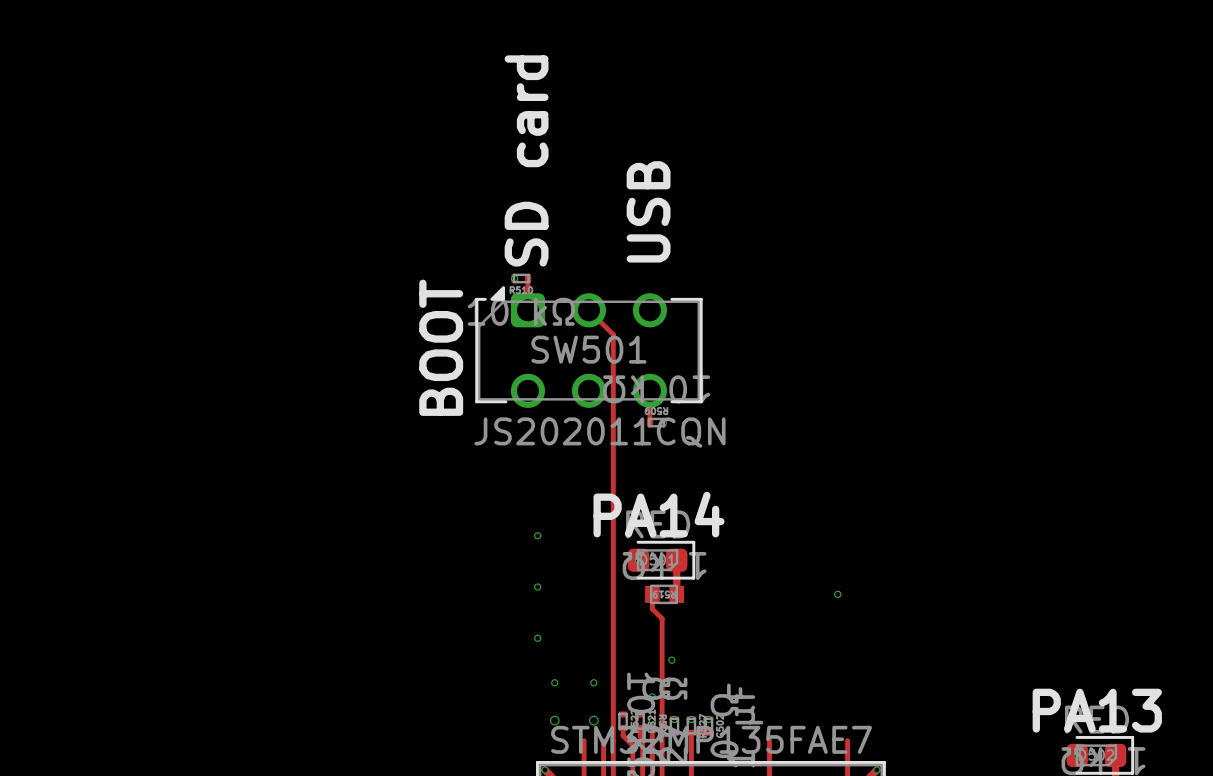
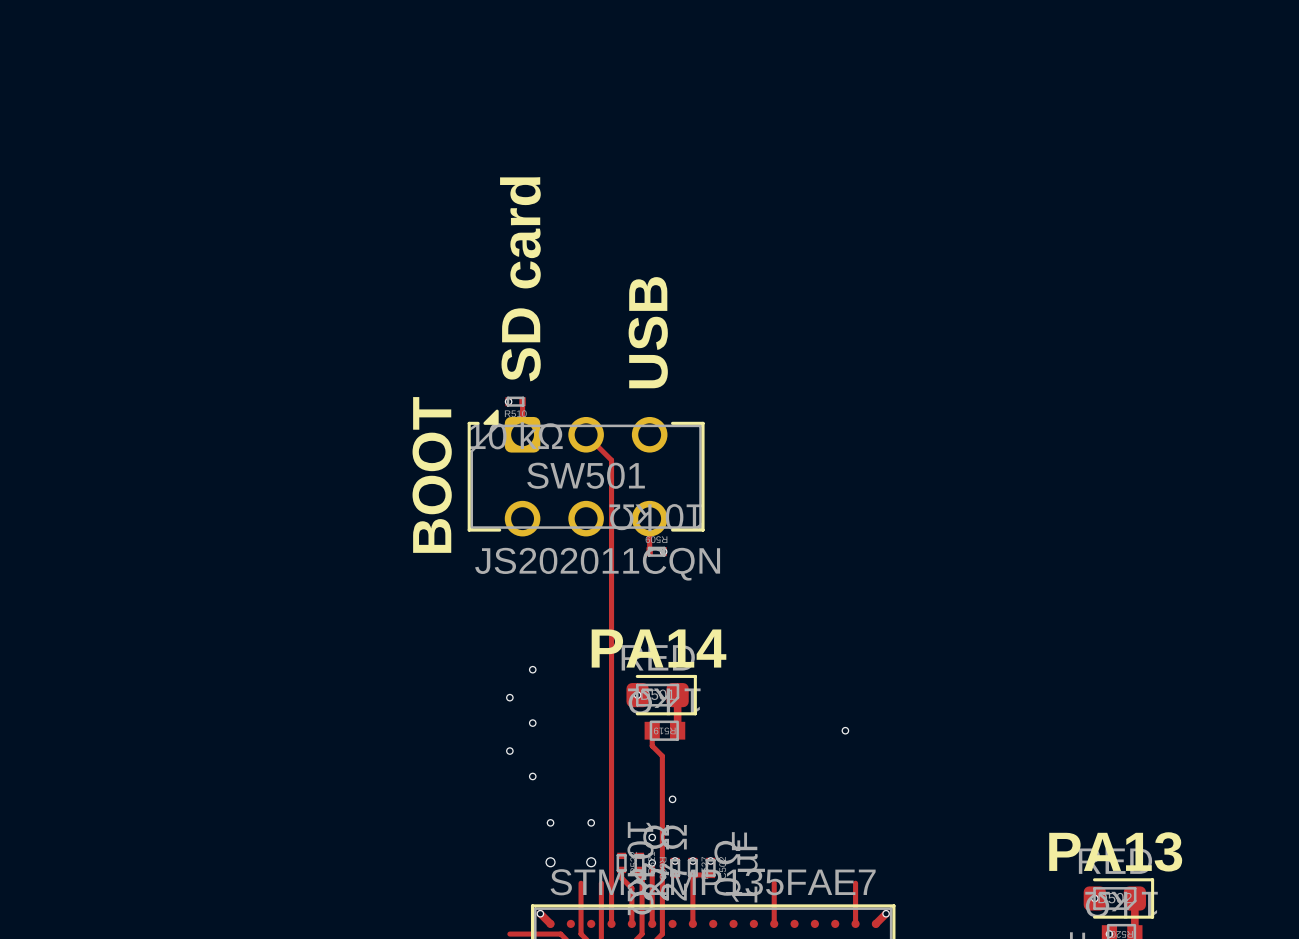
via: none -> (509, 697)
via: none -> (509, 751)

